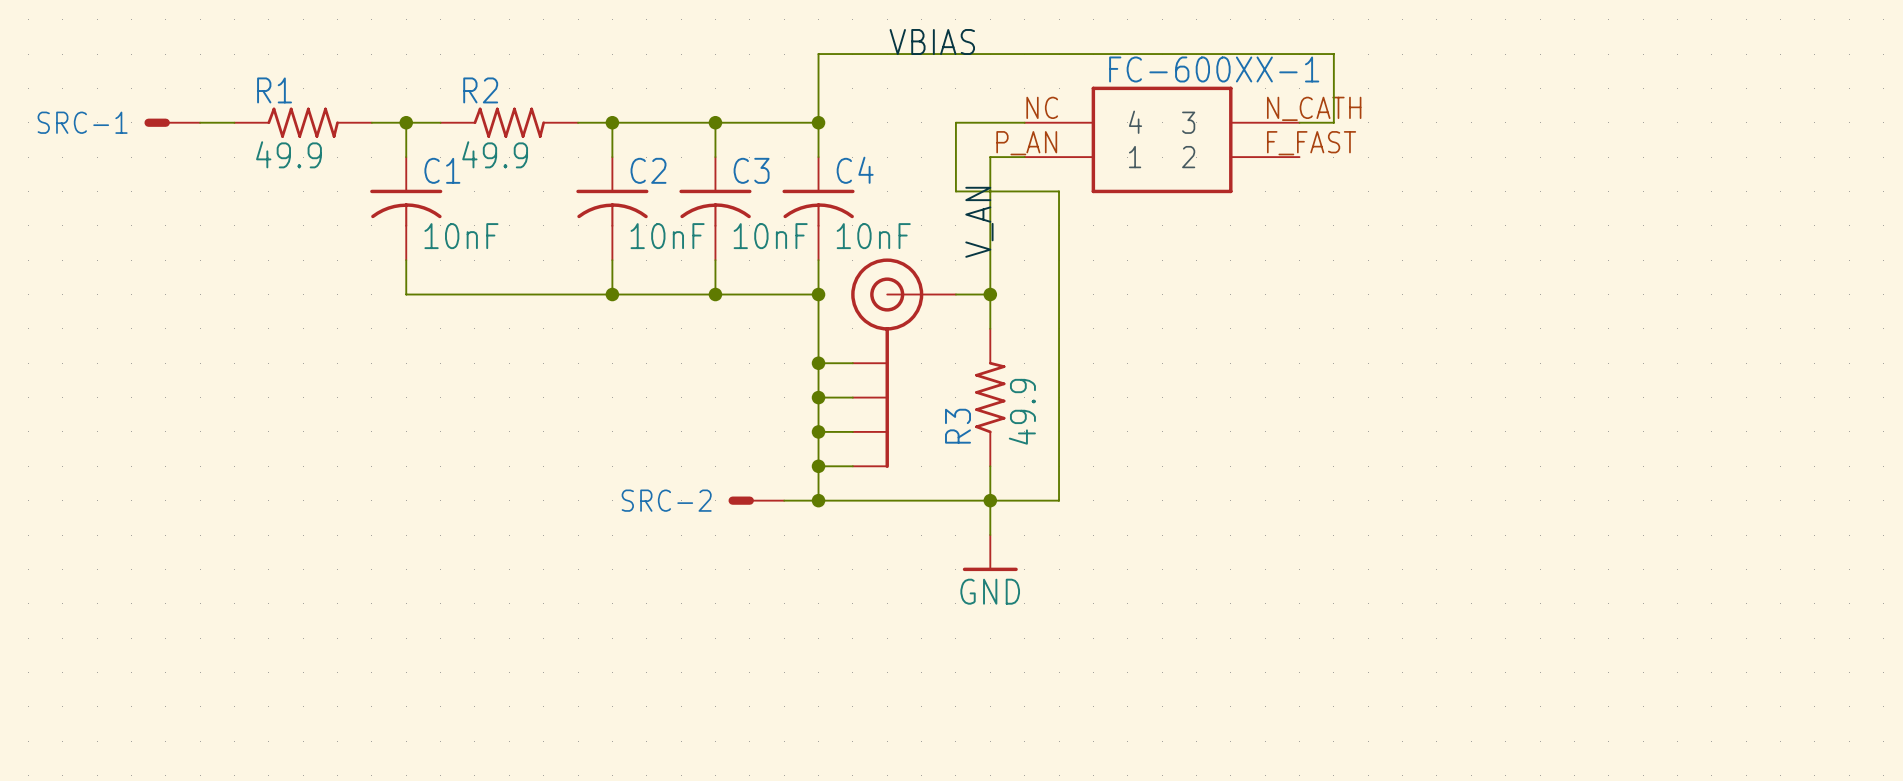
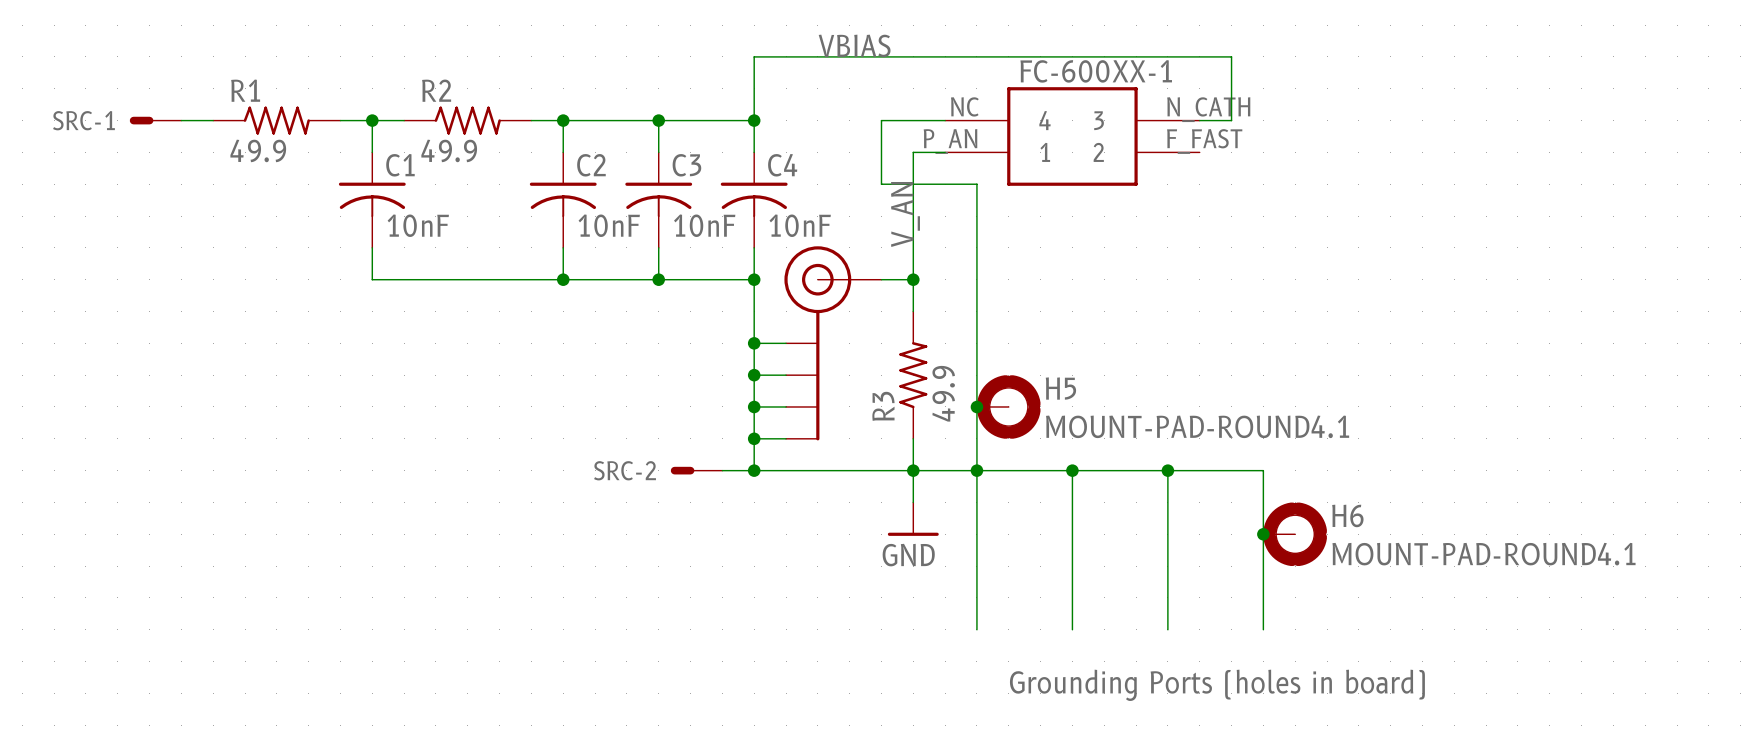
junction: none -> (976, 406)
H5: none -> MOUNT-PAD-ROUND4.1 (1008, 406)
junction: none -> (976, 470)
wire: none -> (1072, 470) (1072, 629)
junction: none -> (1072, 470)
wire: none -> (1167, 470) (1167, 629)
junction: none -> (1167, 470)
junction: none -> (1263, 534)
H6: none -> MOUNT-PAD-ROUND4.1 (1295, 534)
wire: none -> (976, 629) (976, 470) (1263, 470) (1263, 629)
text: none -> Grounding Ports (holes in board) (1217, 685)

